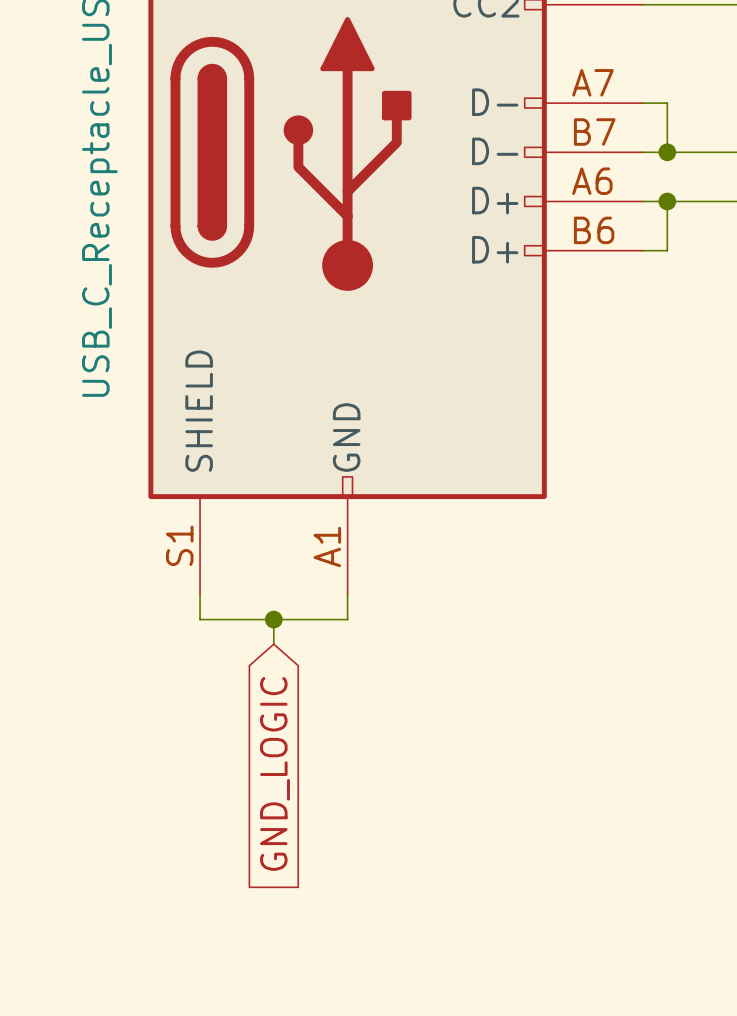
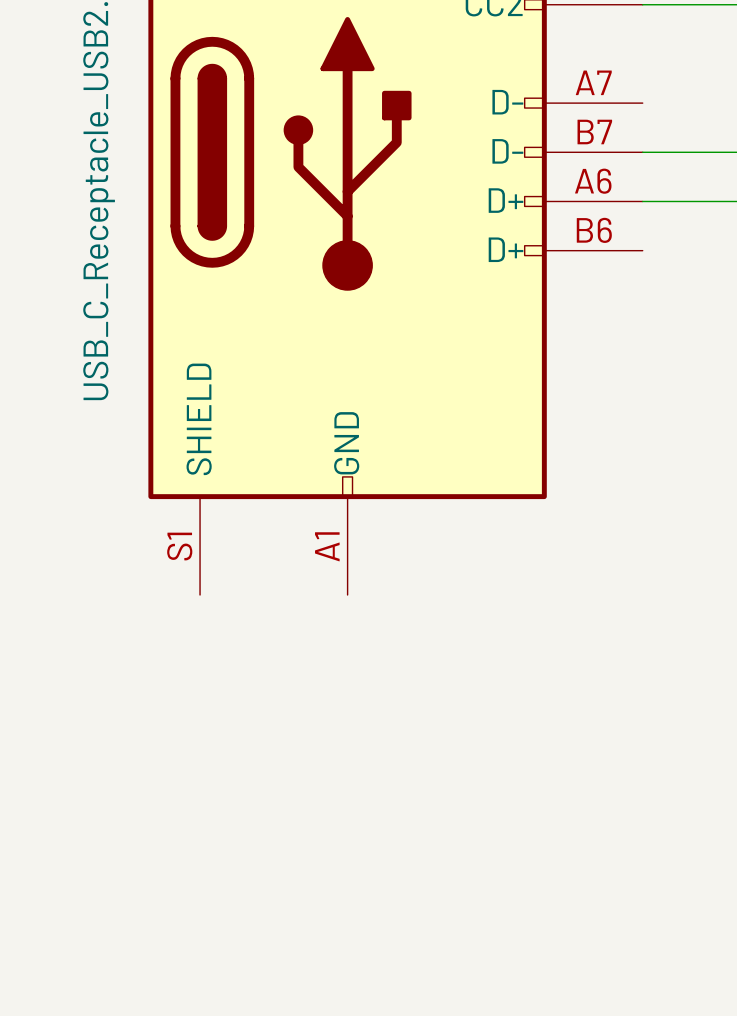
wire: (642, 103) (667, 103) (667, 152) -> none
junction: (667, 152) -> none
wire: (667, 201) (667, 250) (642, 250) -> none
junction: (667, 201) -> none
wire: (200, 594) (200, 619) (347, 619) (347, 594) -> none
wire: (273, 619) (273, 644) -> none
junction: (273, 619) -> none
global label: GND_LOGIC (274, 773) -> none

